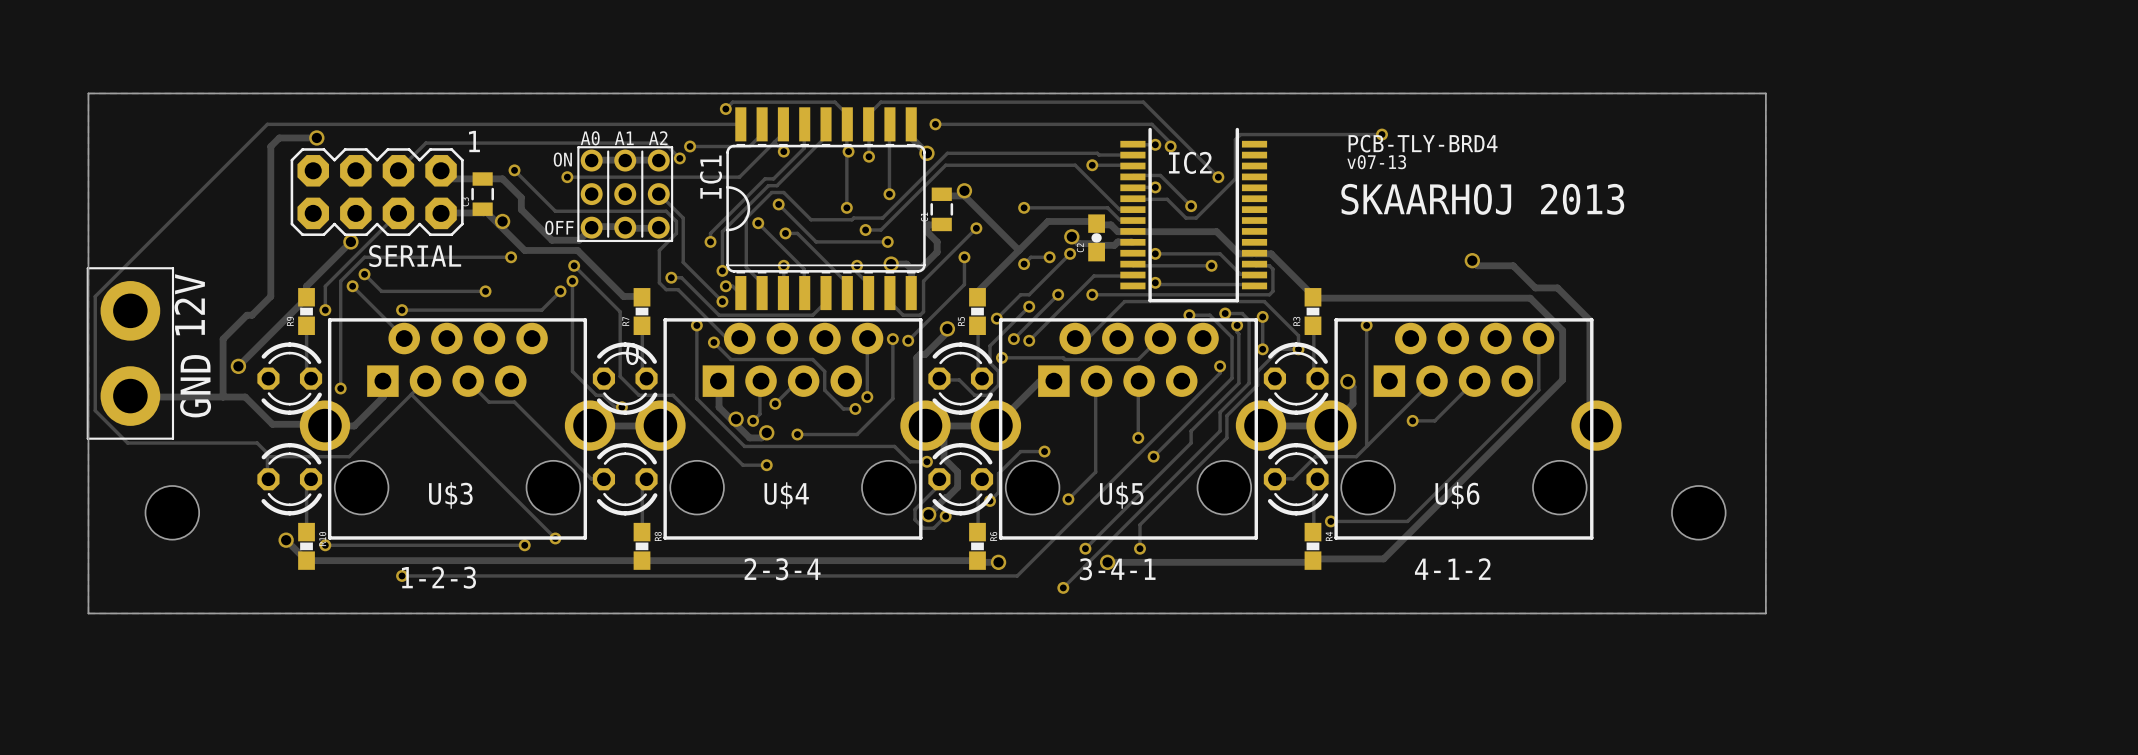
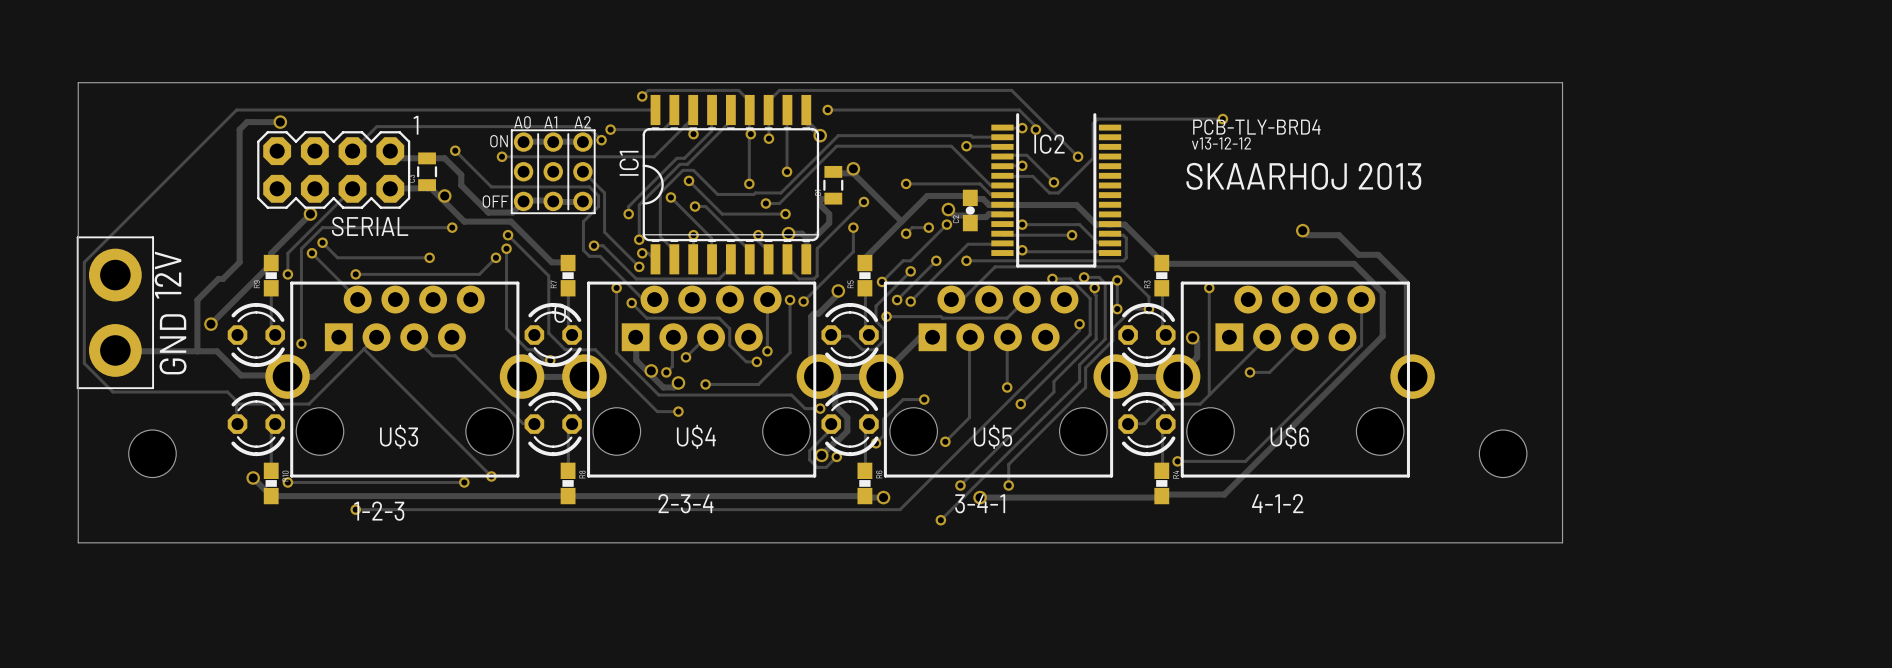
text: v07-13 (1376, 162) -> v13-12-12 (1221, 143)

